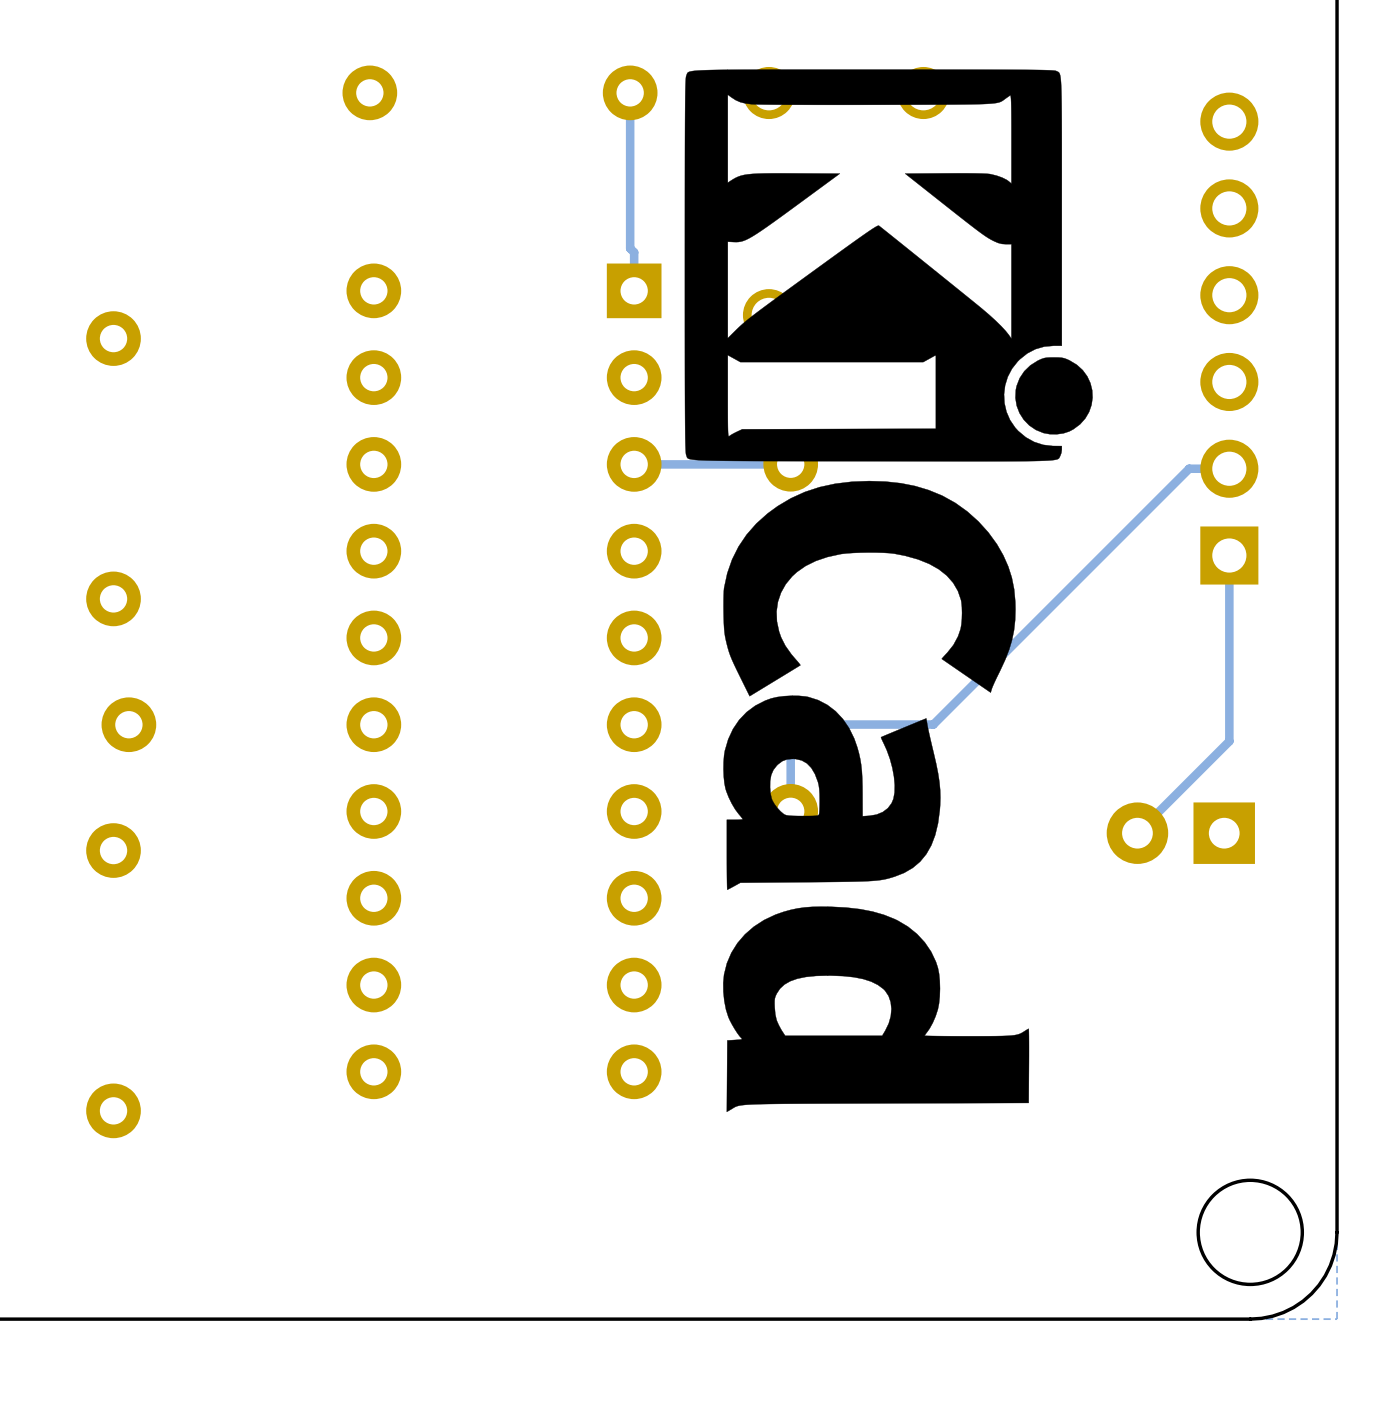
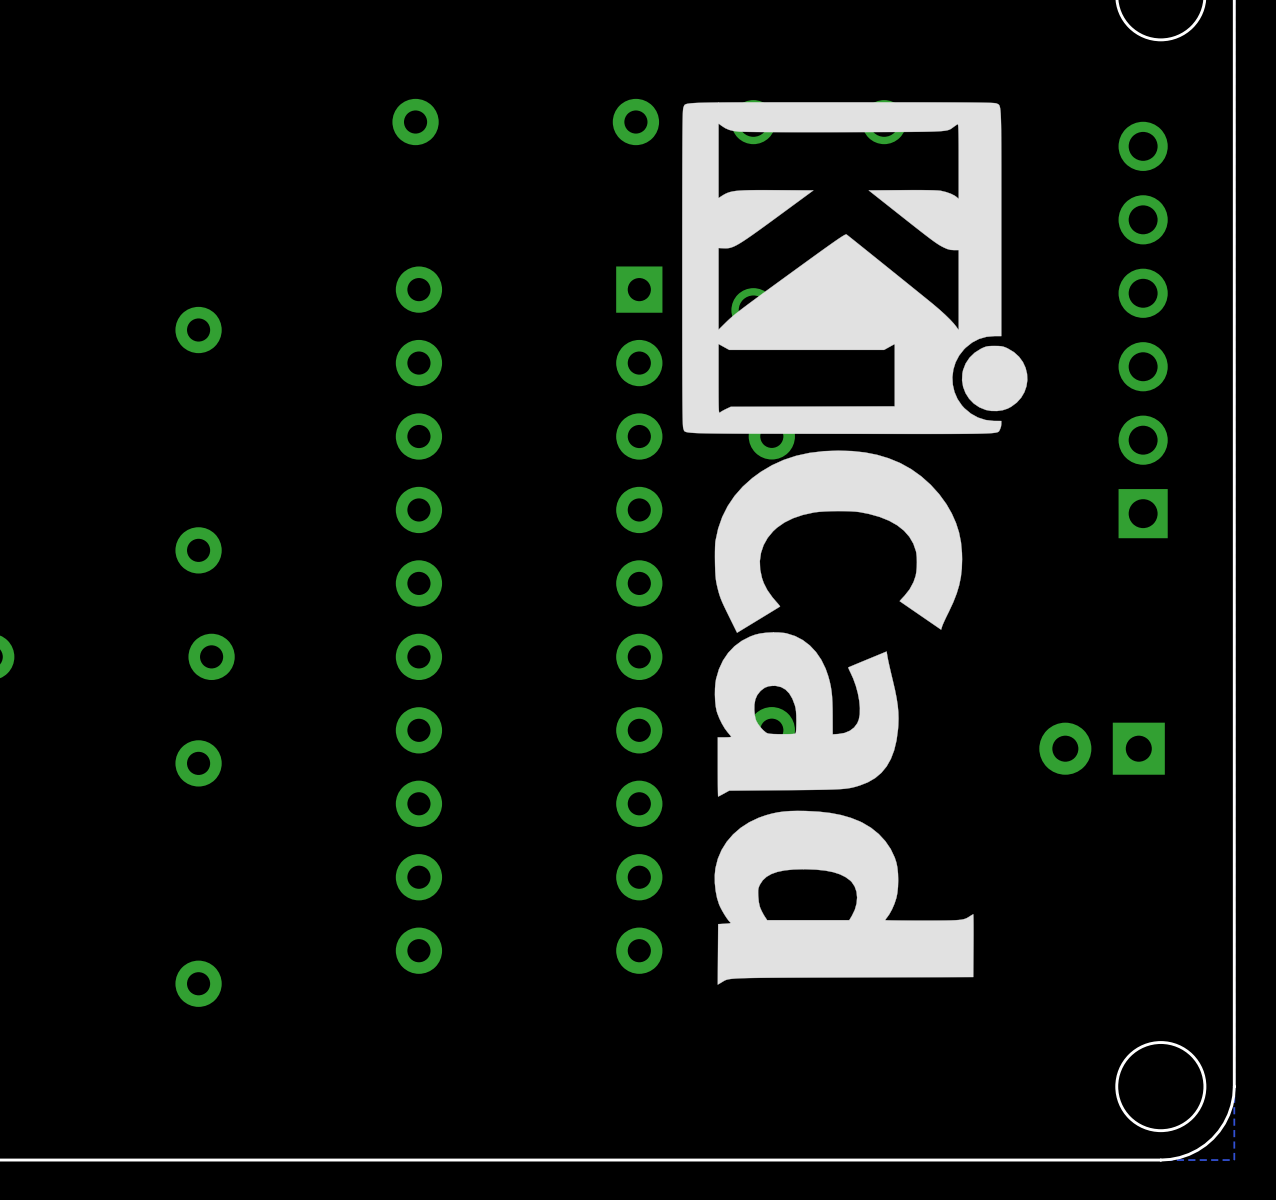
track: (630, 92) (630, 248) (634, 252) (634, 290) -> none
track: (790, 464) (634, 464) -> none
track: (1229, 468) (1189, 468) (933, 724) (790, 724) (790, 811) -> none
track: (1229, 555) (1229, 741) (1137, 833) -> none

